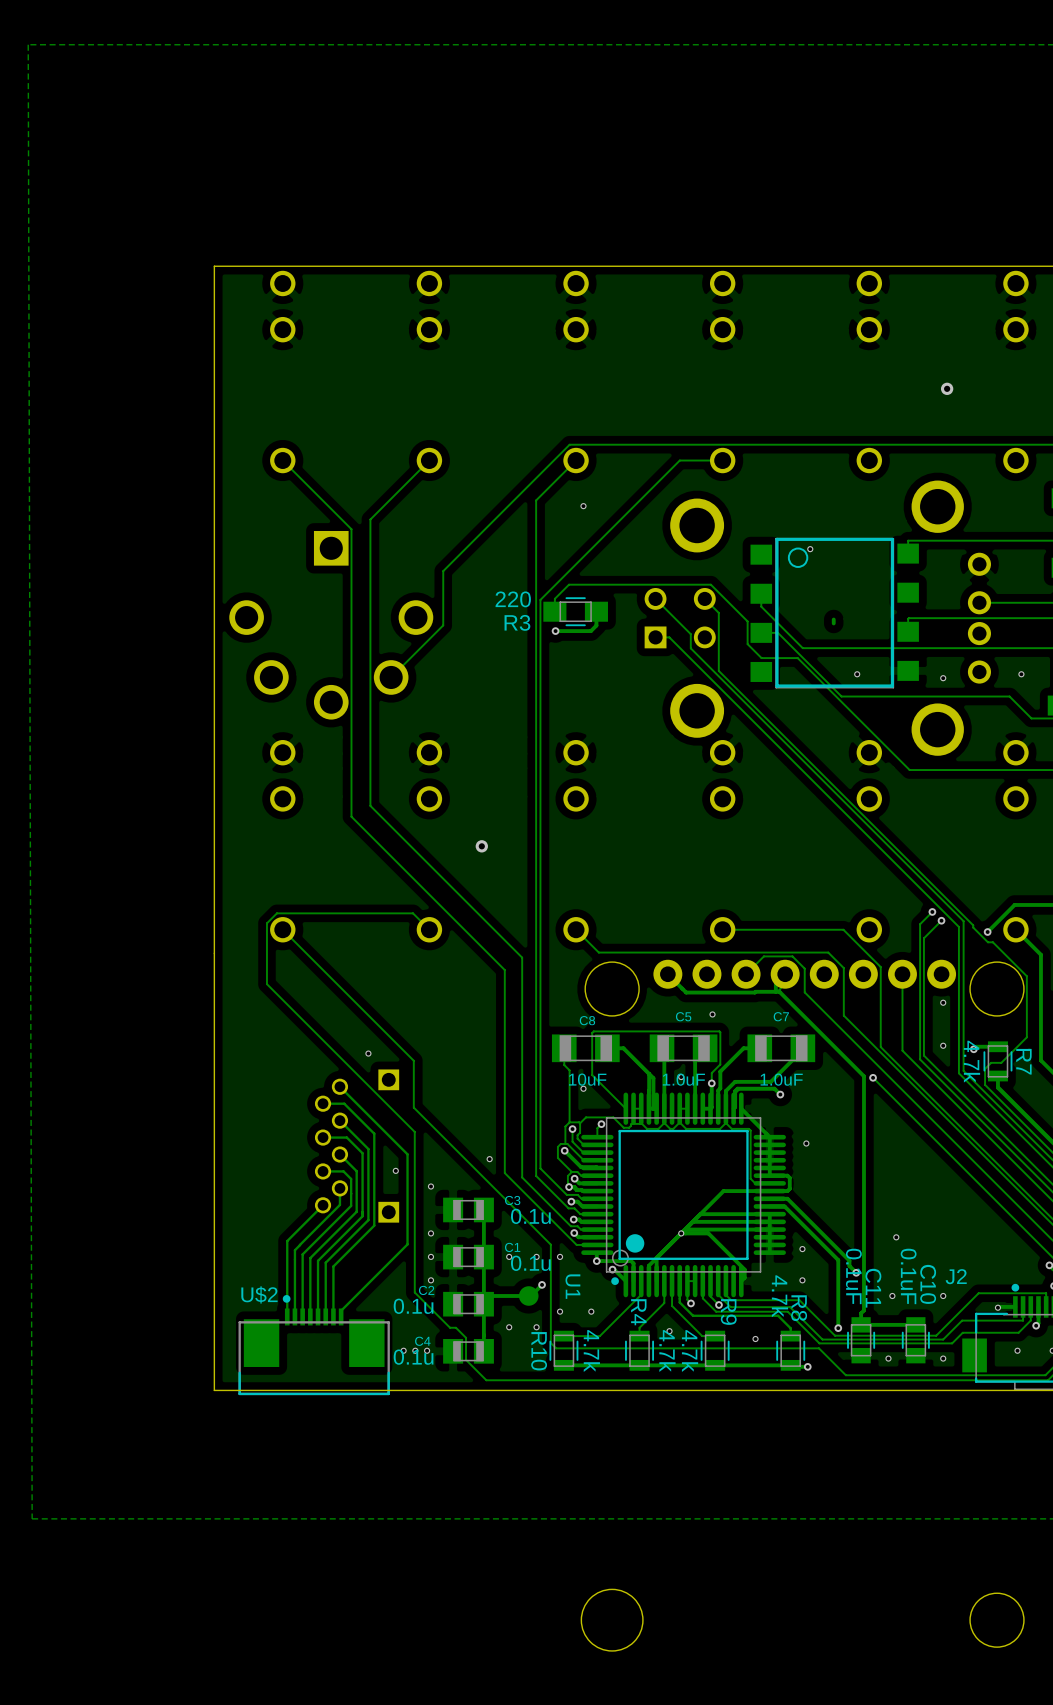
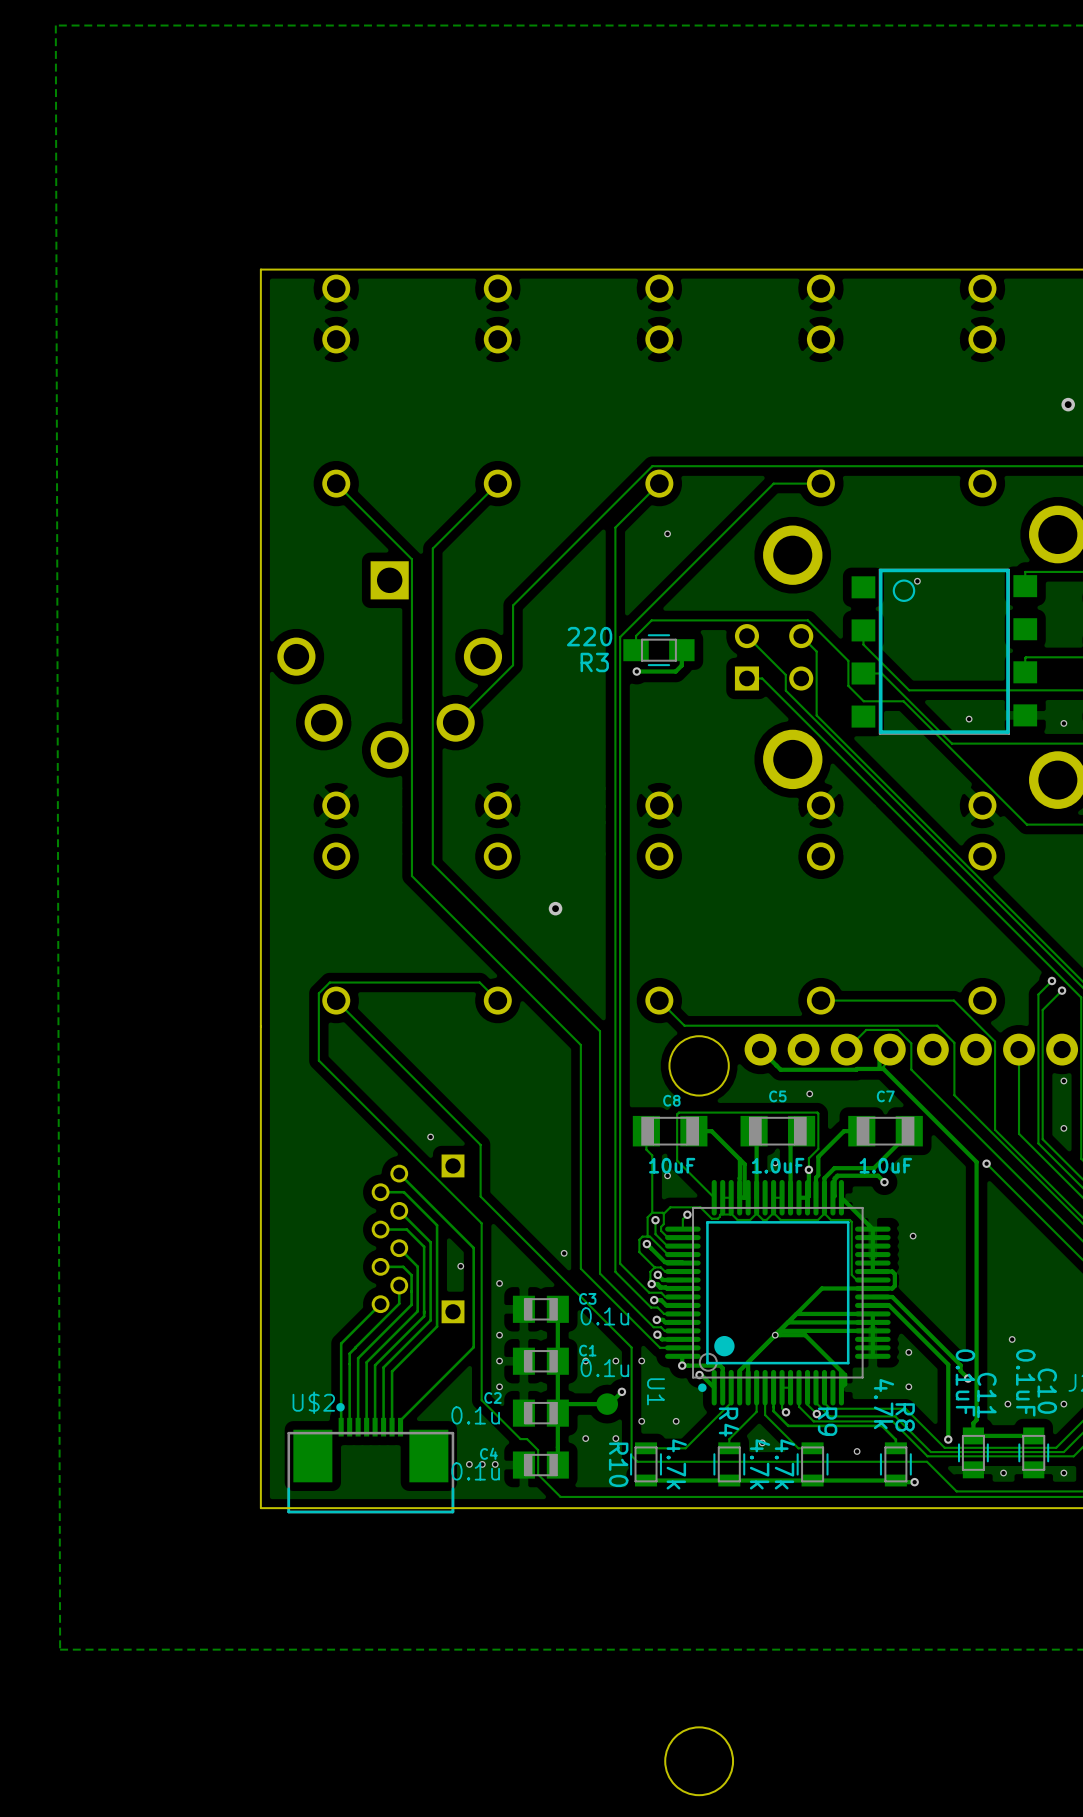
track: (833, 619) (833, 623) -> none

